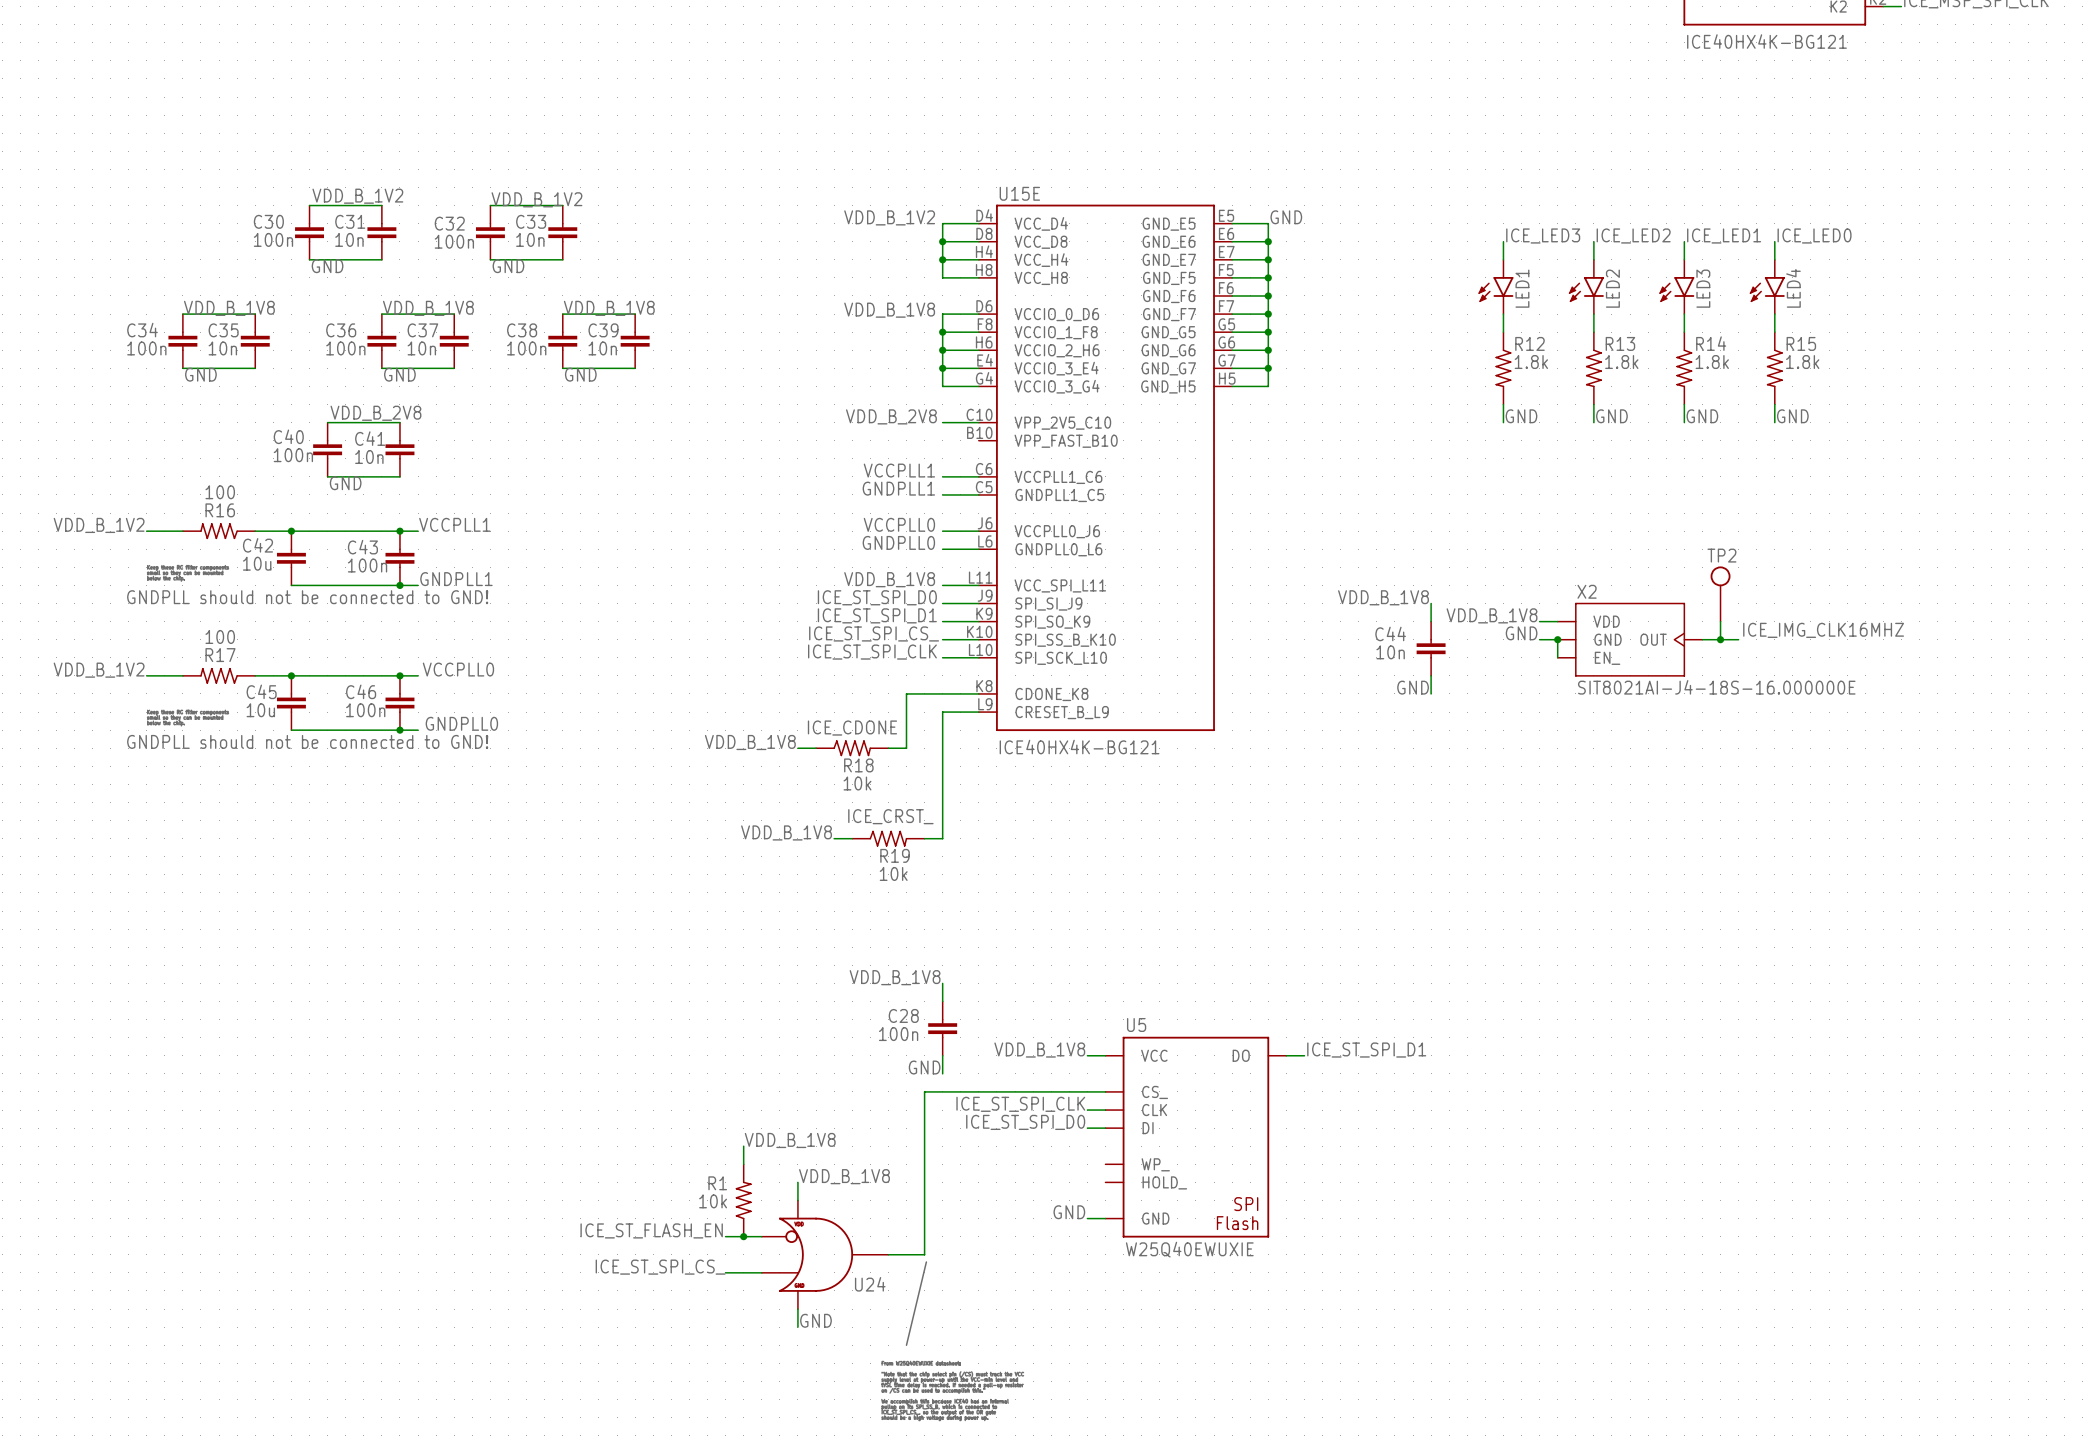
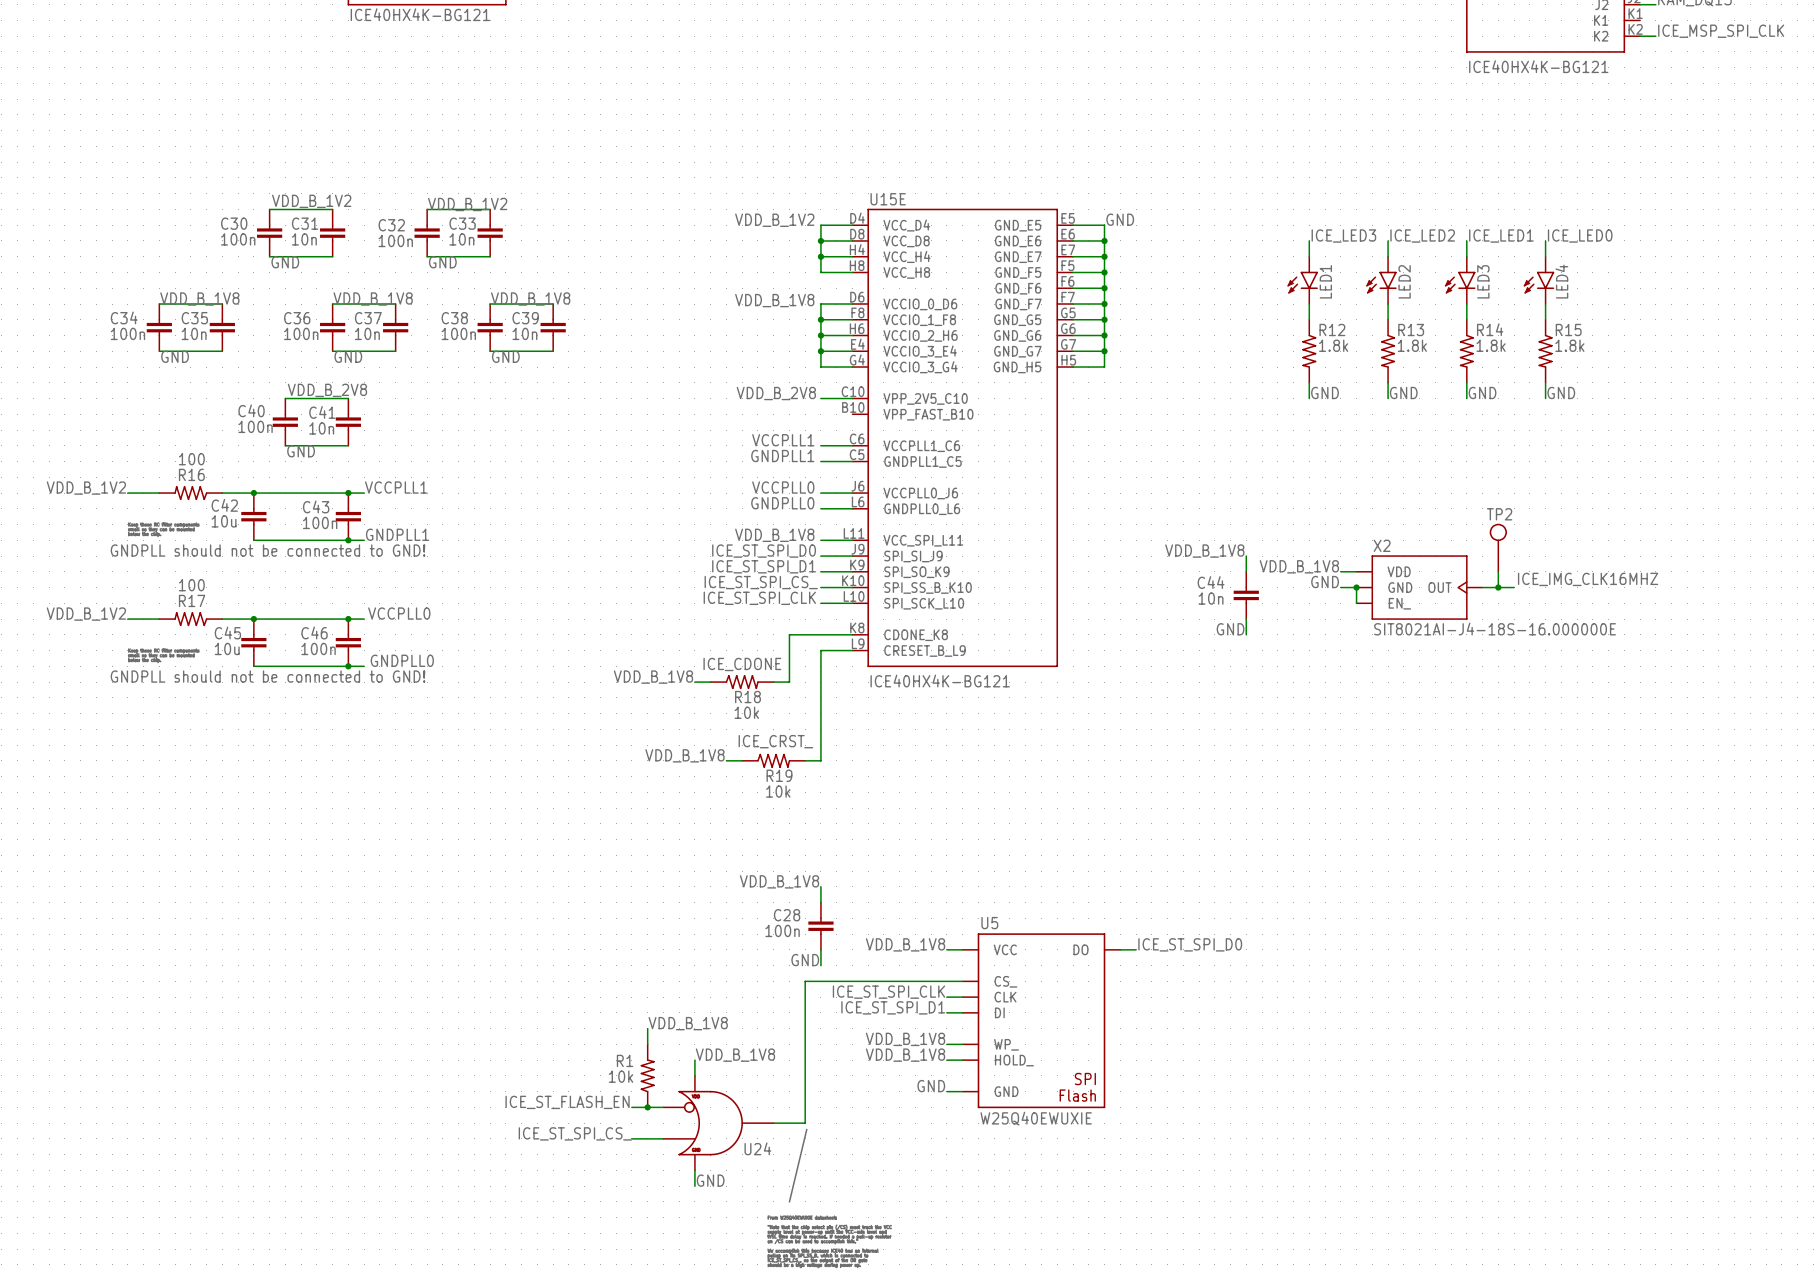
label: ICE_ST_SPI_D1 (1366, 1050) -> ICE_ST_SPI_D0 (1190, 944)
label: ICE_ST_SPI_D0 (1025, 1122) -> ICE_ST_SPI_D1 (893, 1007)
label: none -> VDD_B_1V8 (905, 1039)
wire: none -> (946, 1044) (962, 1044)
label: none -> VDD_B_1V8 (905, 1055)
wire: none -> (946, 1060) (962, 1060)

